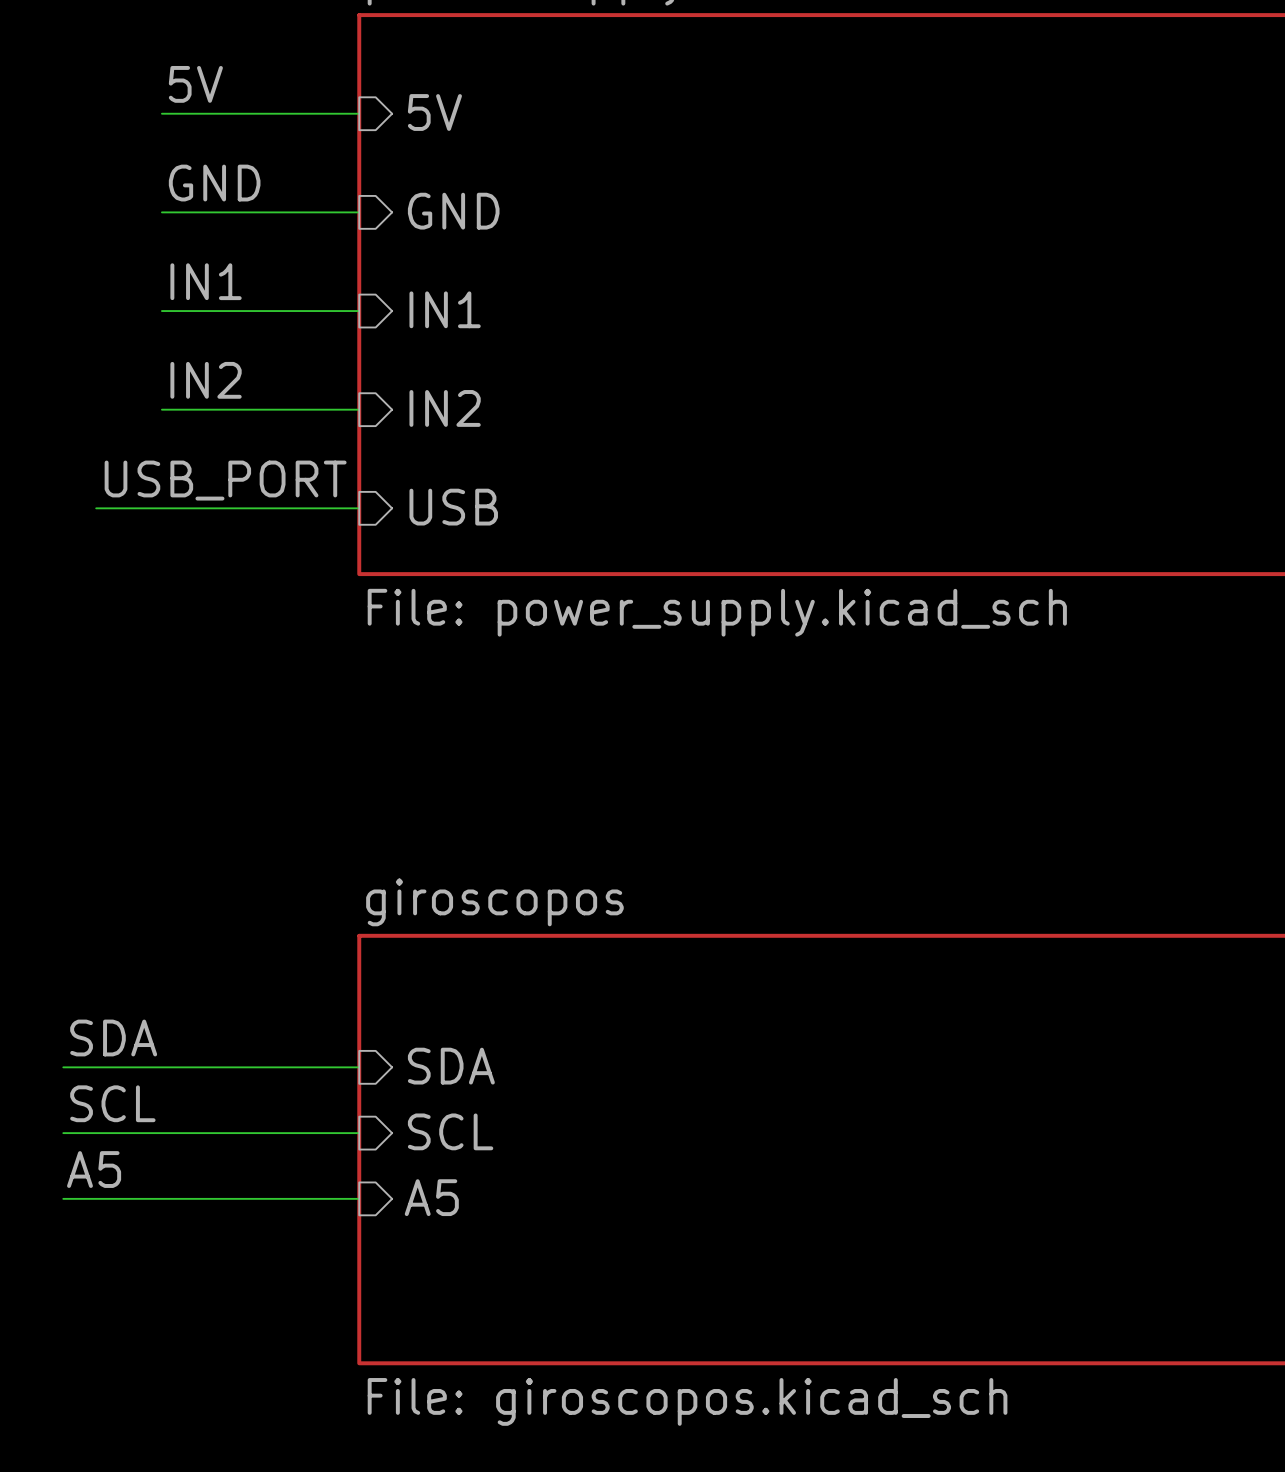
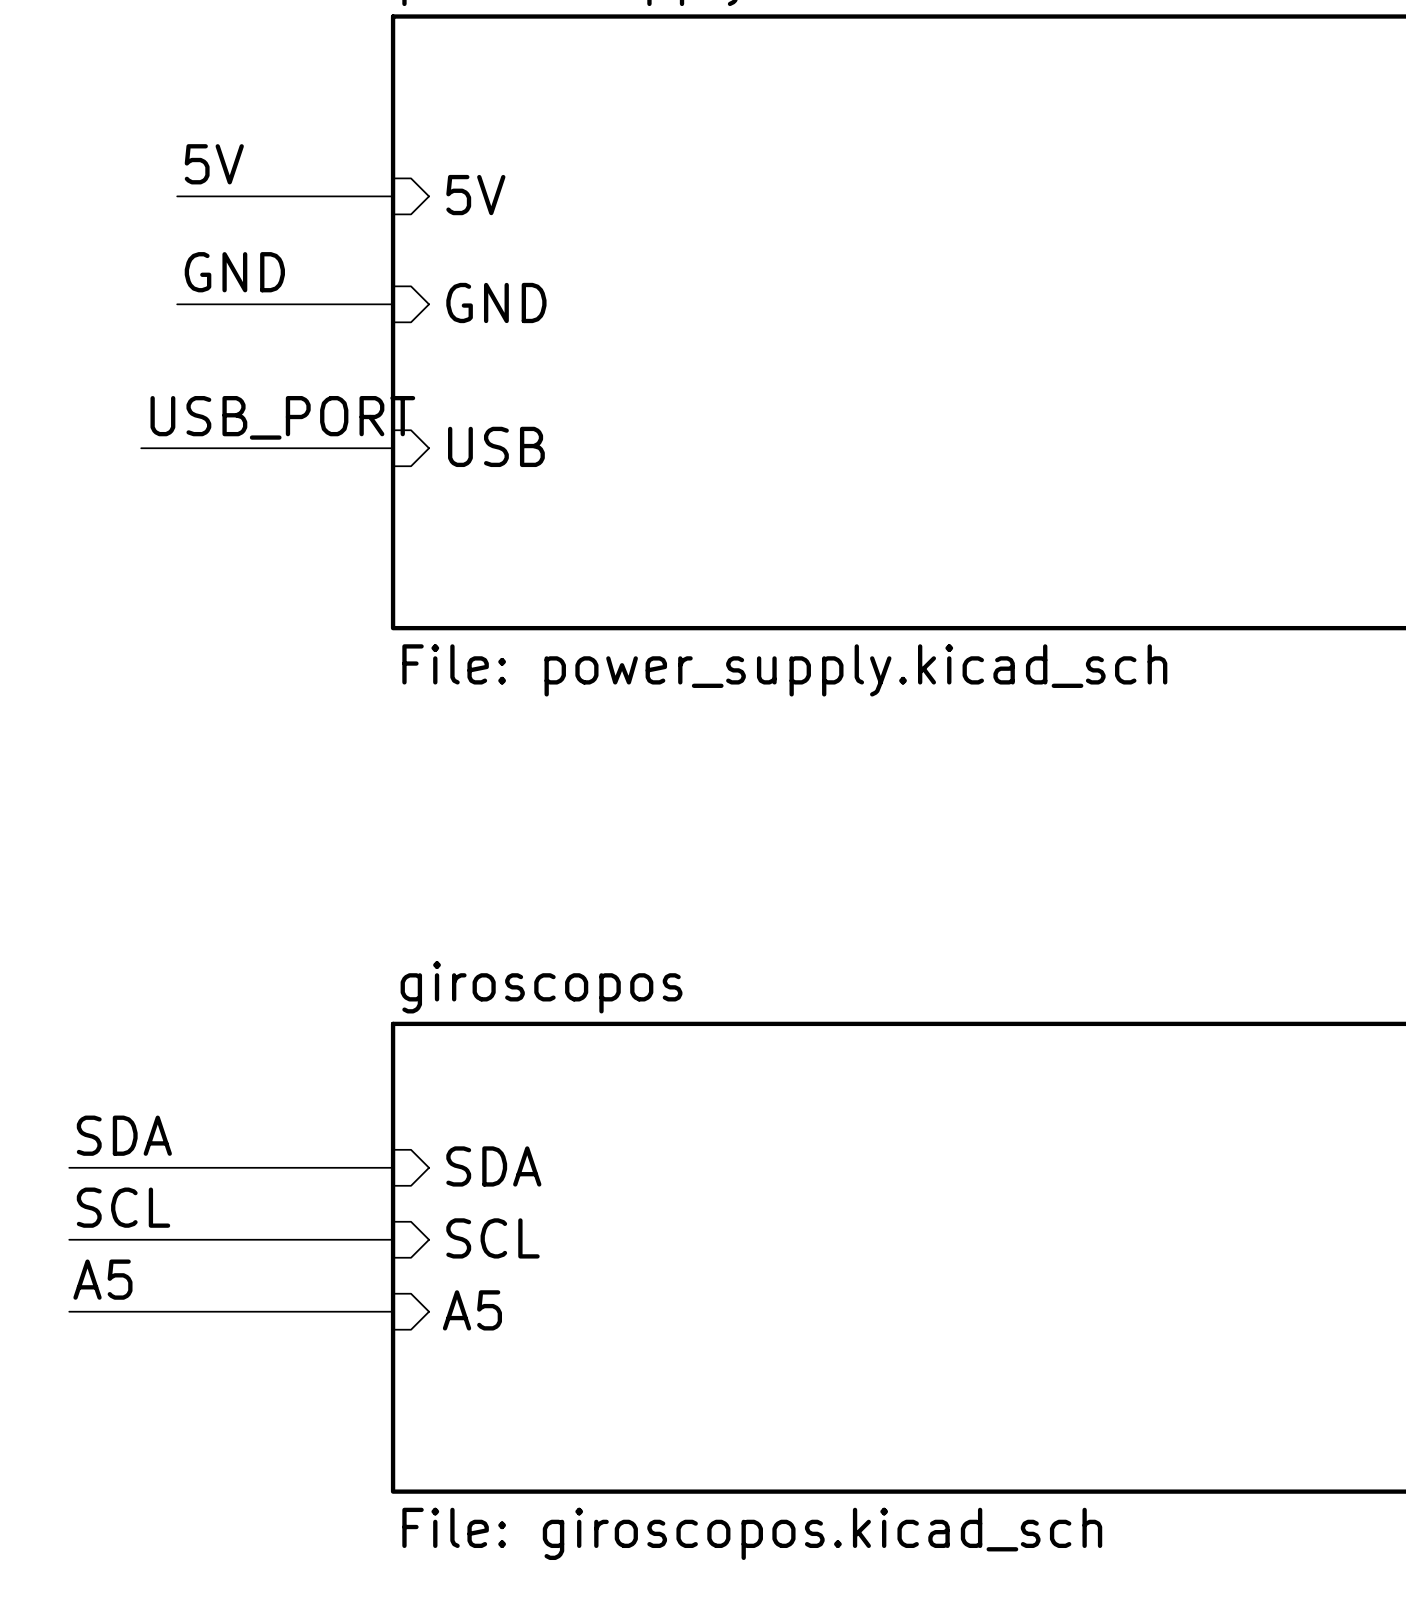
label position: 5V (195, 84) -> 5V (214, 164)
sheet pin position: 5V (434, 112) -> 5V (475, 195)
wire: (161, 113) (359, 113) -> none
label position: GND (214, 183) -> GND (234, 272)
sheet pin position: GND (453, 211) -> GND (496, 302)
wire: (161, 212) (359, 212) -> (177, 196) (393, 196)
label: IN1 (206, 281) -> none
sheet pin: IN1 (445, 309) -> none
wire: (161, 311) (359, 311) -> (177, 304) (393, 304)
label: IN2 (206, 380) -> none
sheet pin: IN2 (445, 408) -> USB (496, 446)
wire: none -> (141, 448) (177, 448)
label position: USB_PORT (225, 480) -> USB_PORT (282, 417)
sheet pin: USB (453, 507) -> none
wire: (96, 508) (359, 508) -> none

